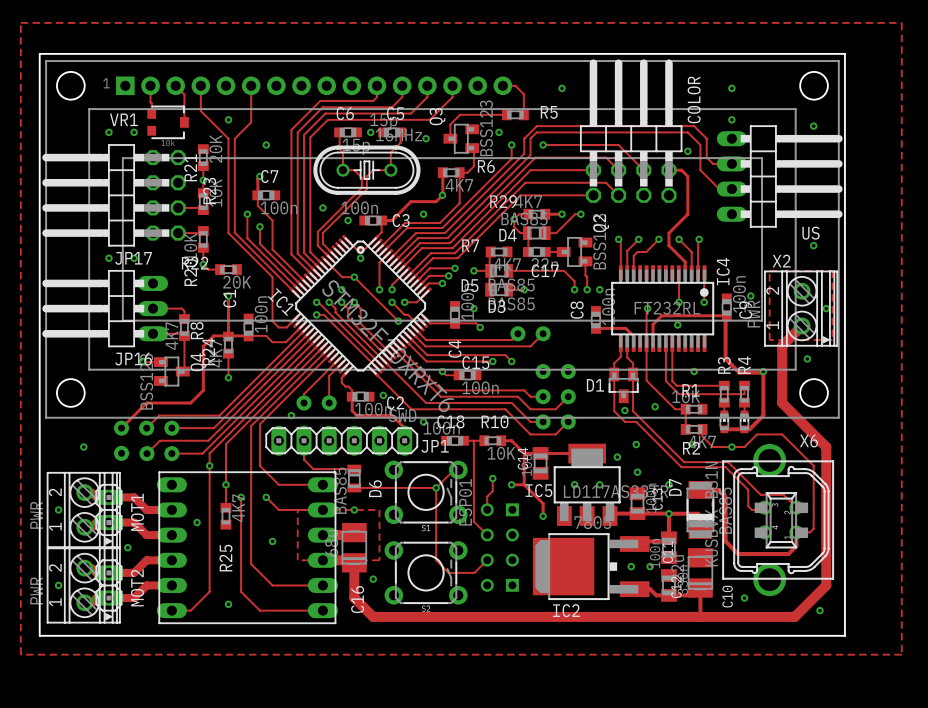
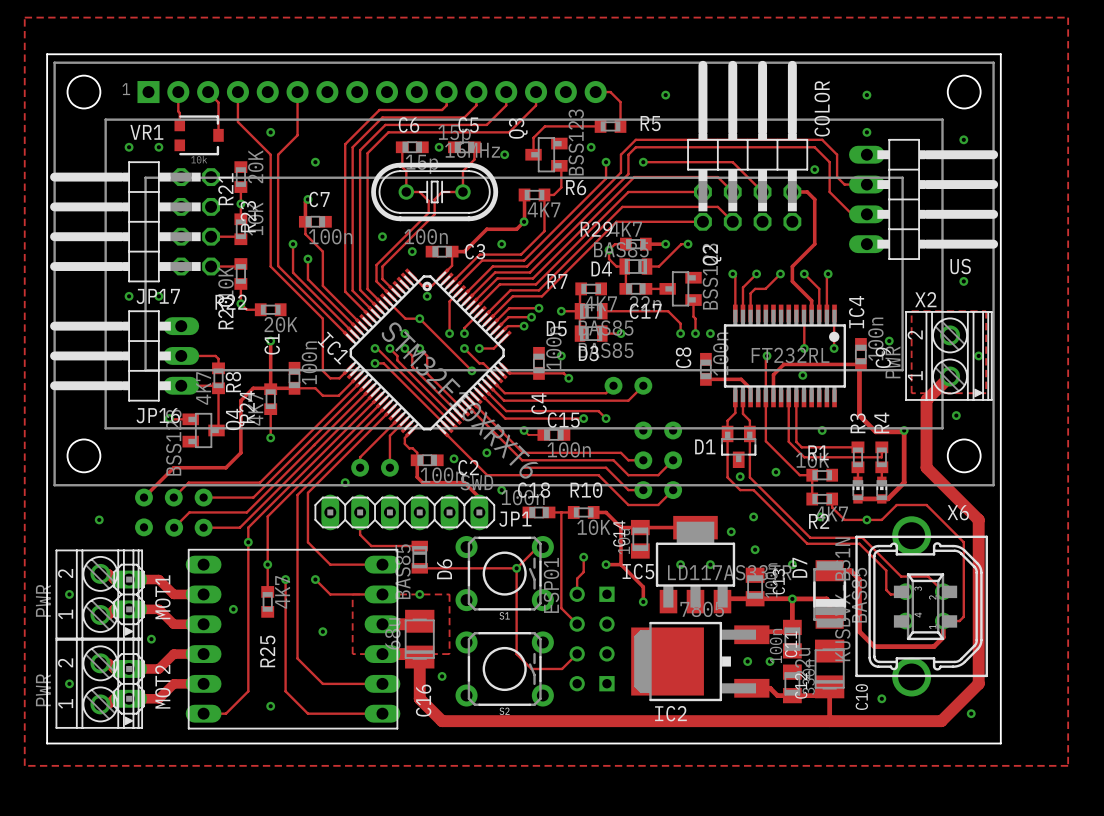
track: (384, 361) (426, 402) (442, 402) -> none
via: none -> (486, 452)

